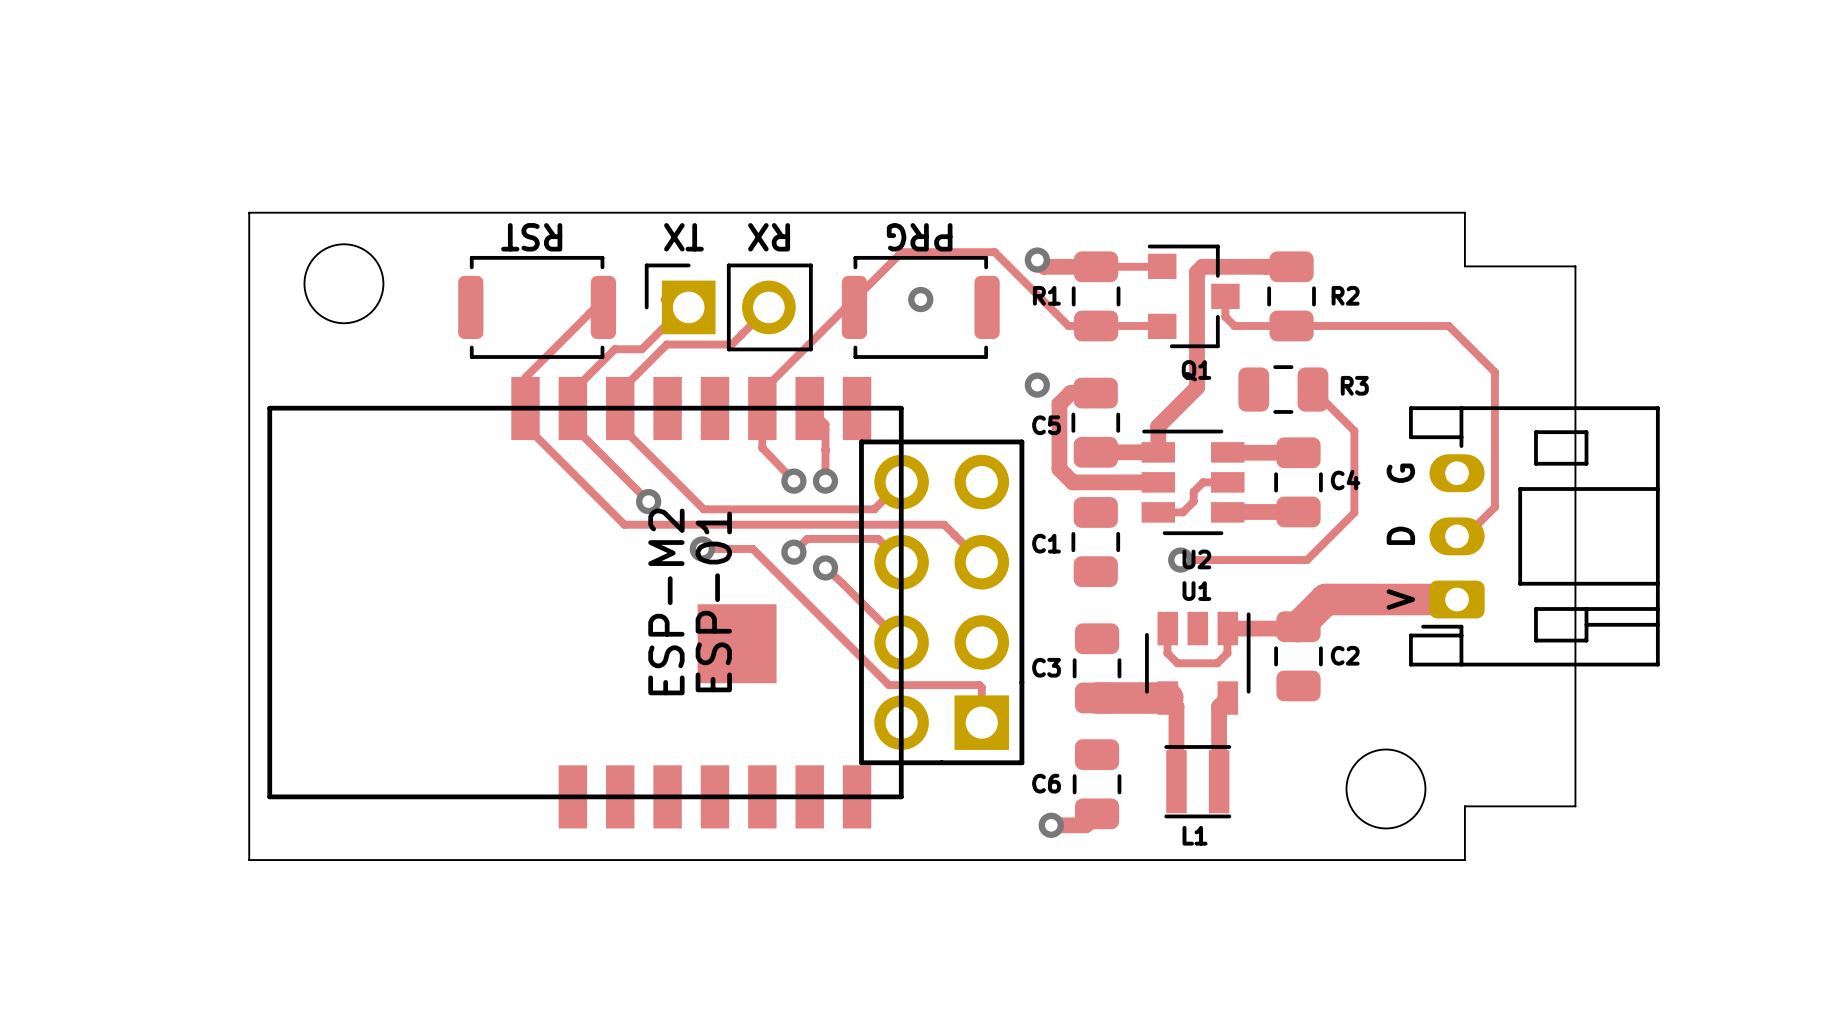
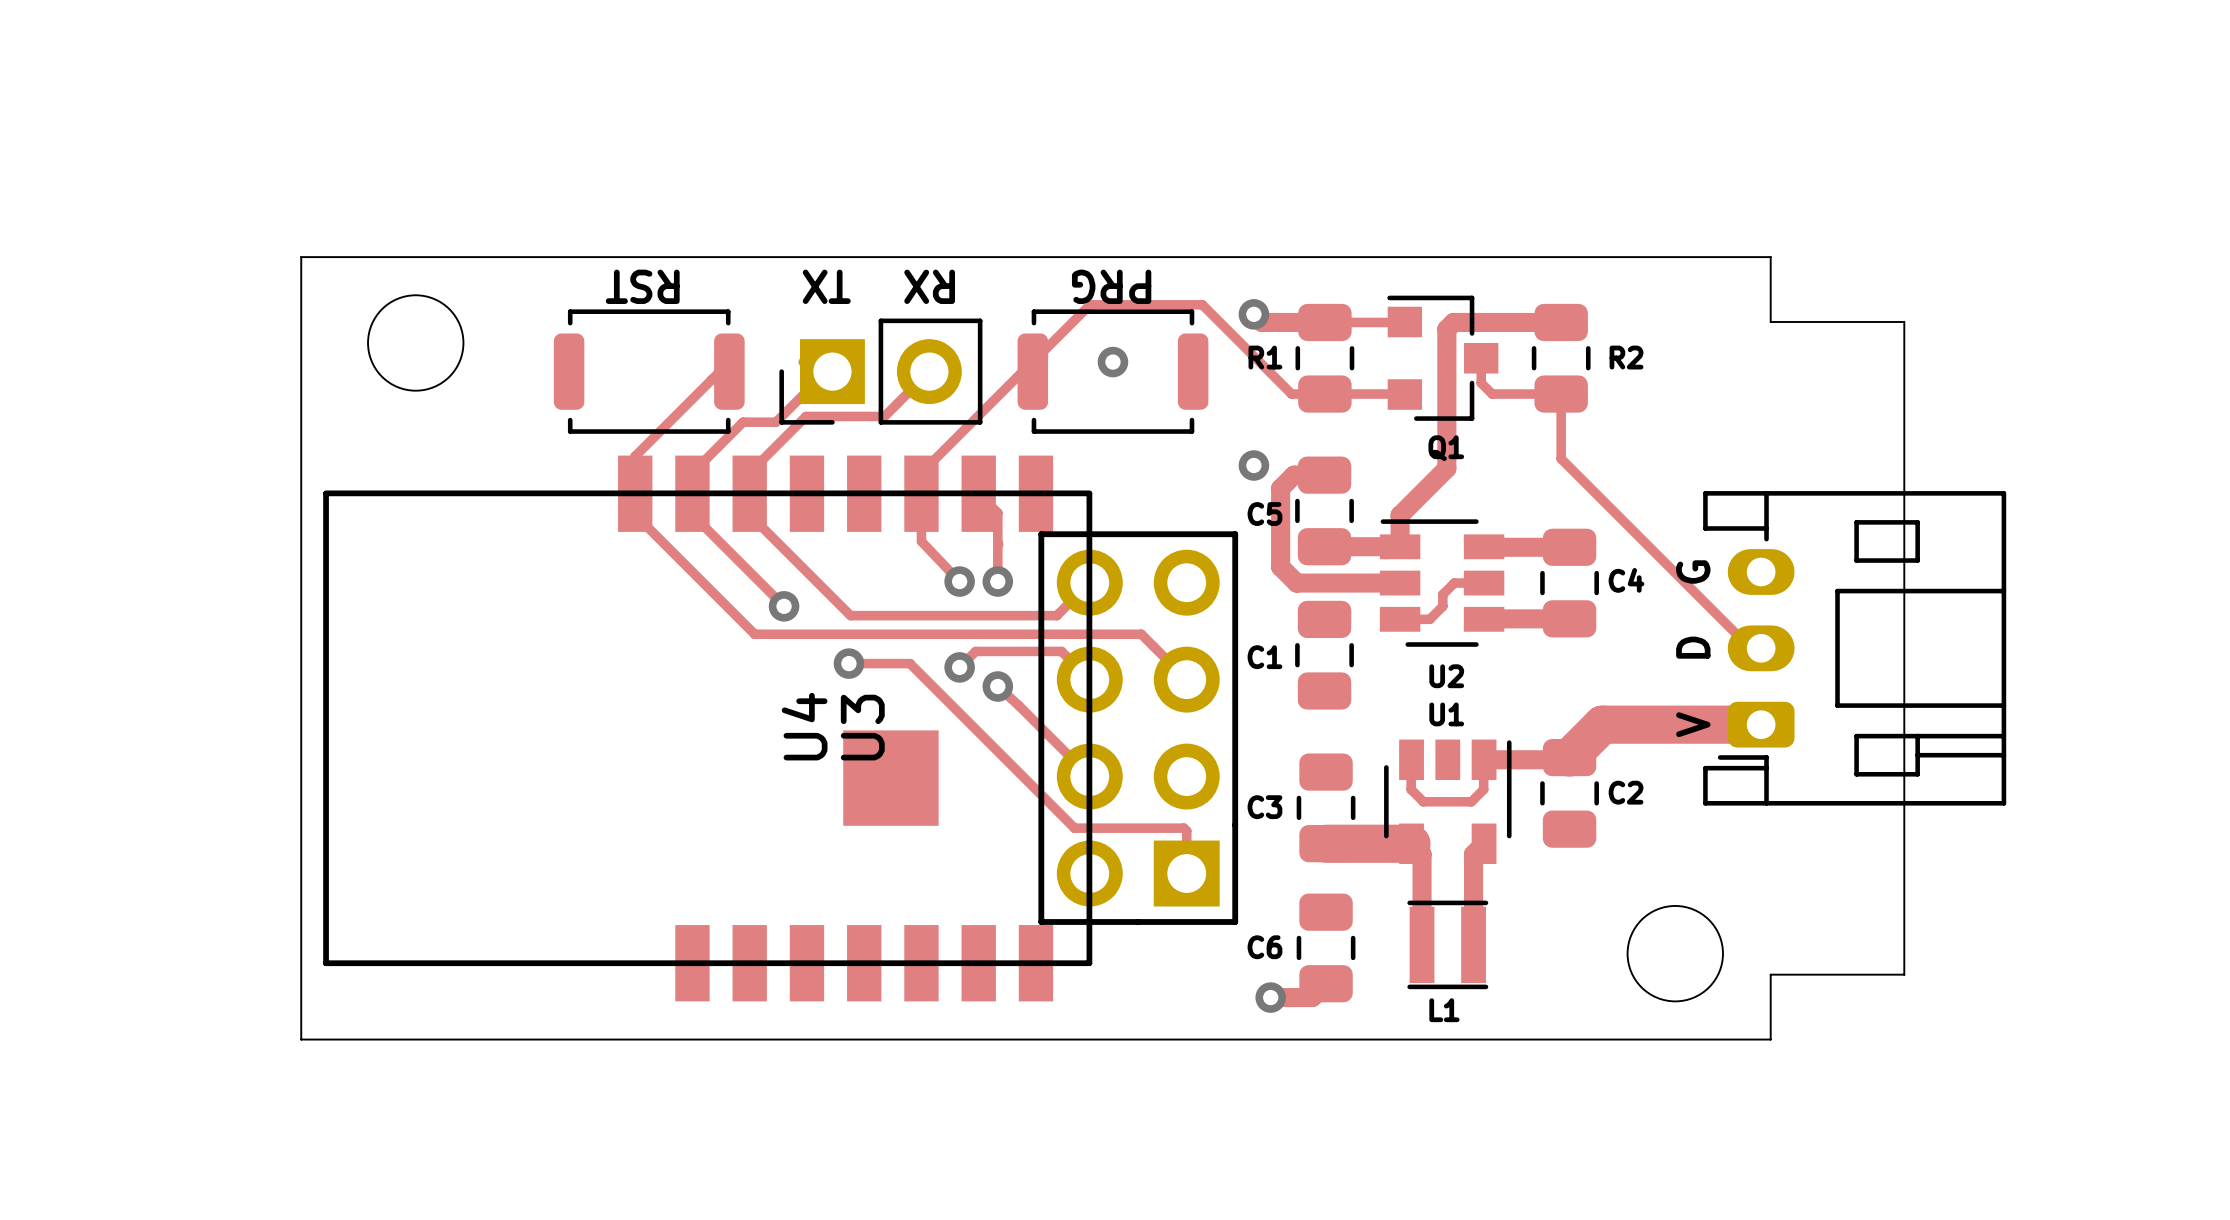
part footprint: [644, 263, 813, 352] -> [779, 318, 983, 425]
track: (1291, 325) (1448, 325) (1494, 372) (1494, 507) (1465, 536) (1457, 536) -> (1561, 394) (1561, 458) (1750, 648) (1761, 648)
R3: (1283, 389) -> none
track: (1312, 389) (1354, 430) (1354, 512) (1307, 560) (1180, 560) -> none
via: (1180, 560) -> none
ESP-M2 name: ESP-M2 (666, 601) -> U4 (804, 726)
ESP-01 name: ESP-01 (713, 601) -> U3 (862, 727)

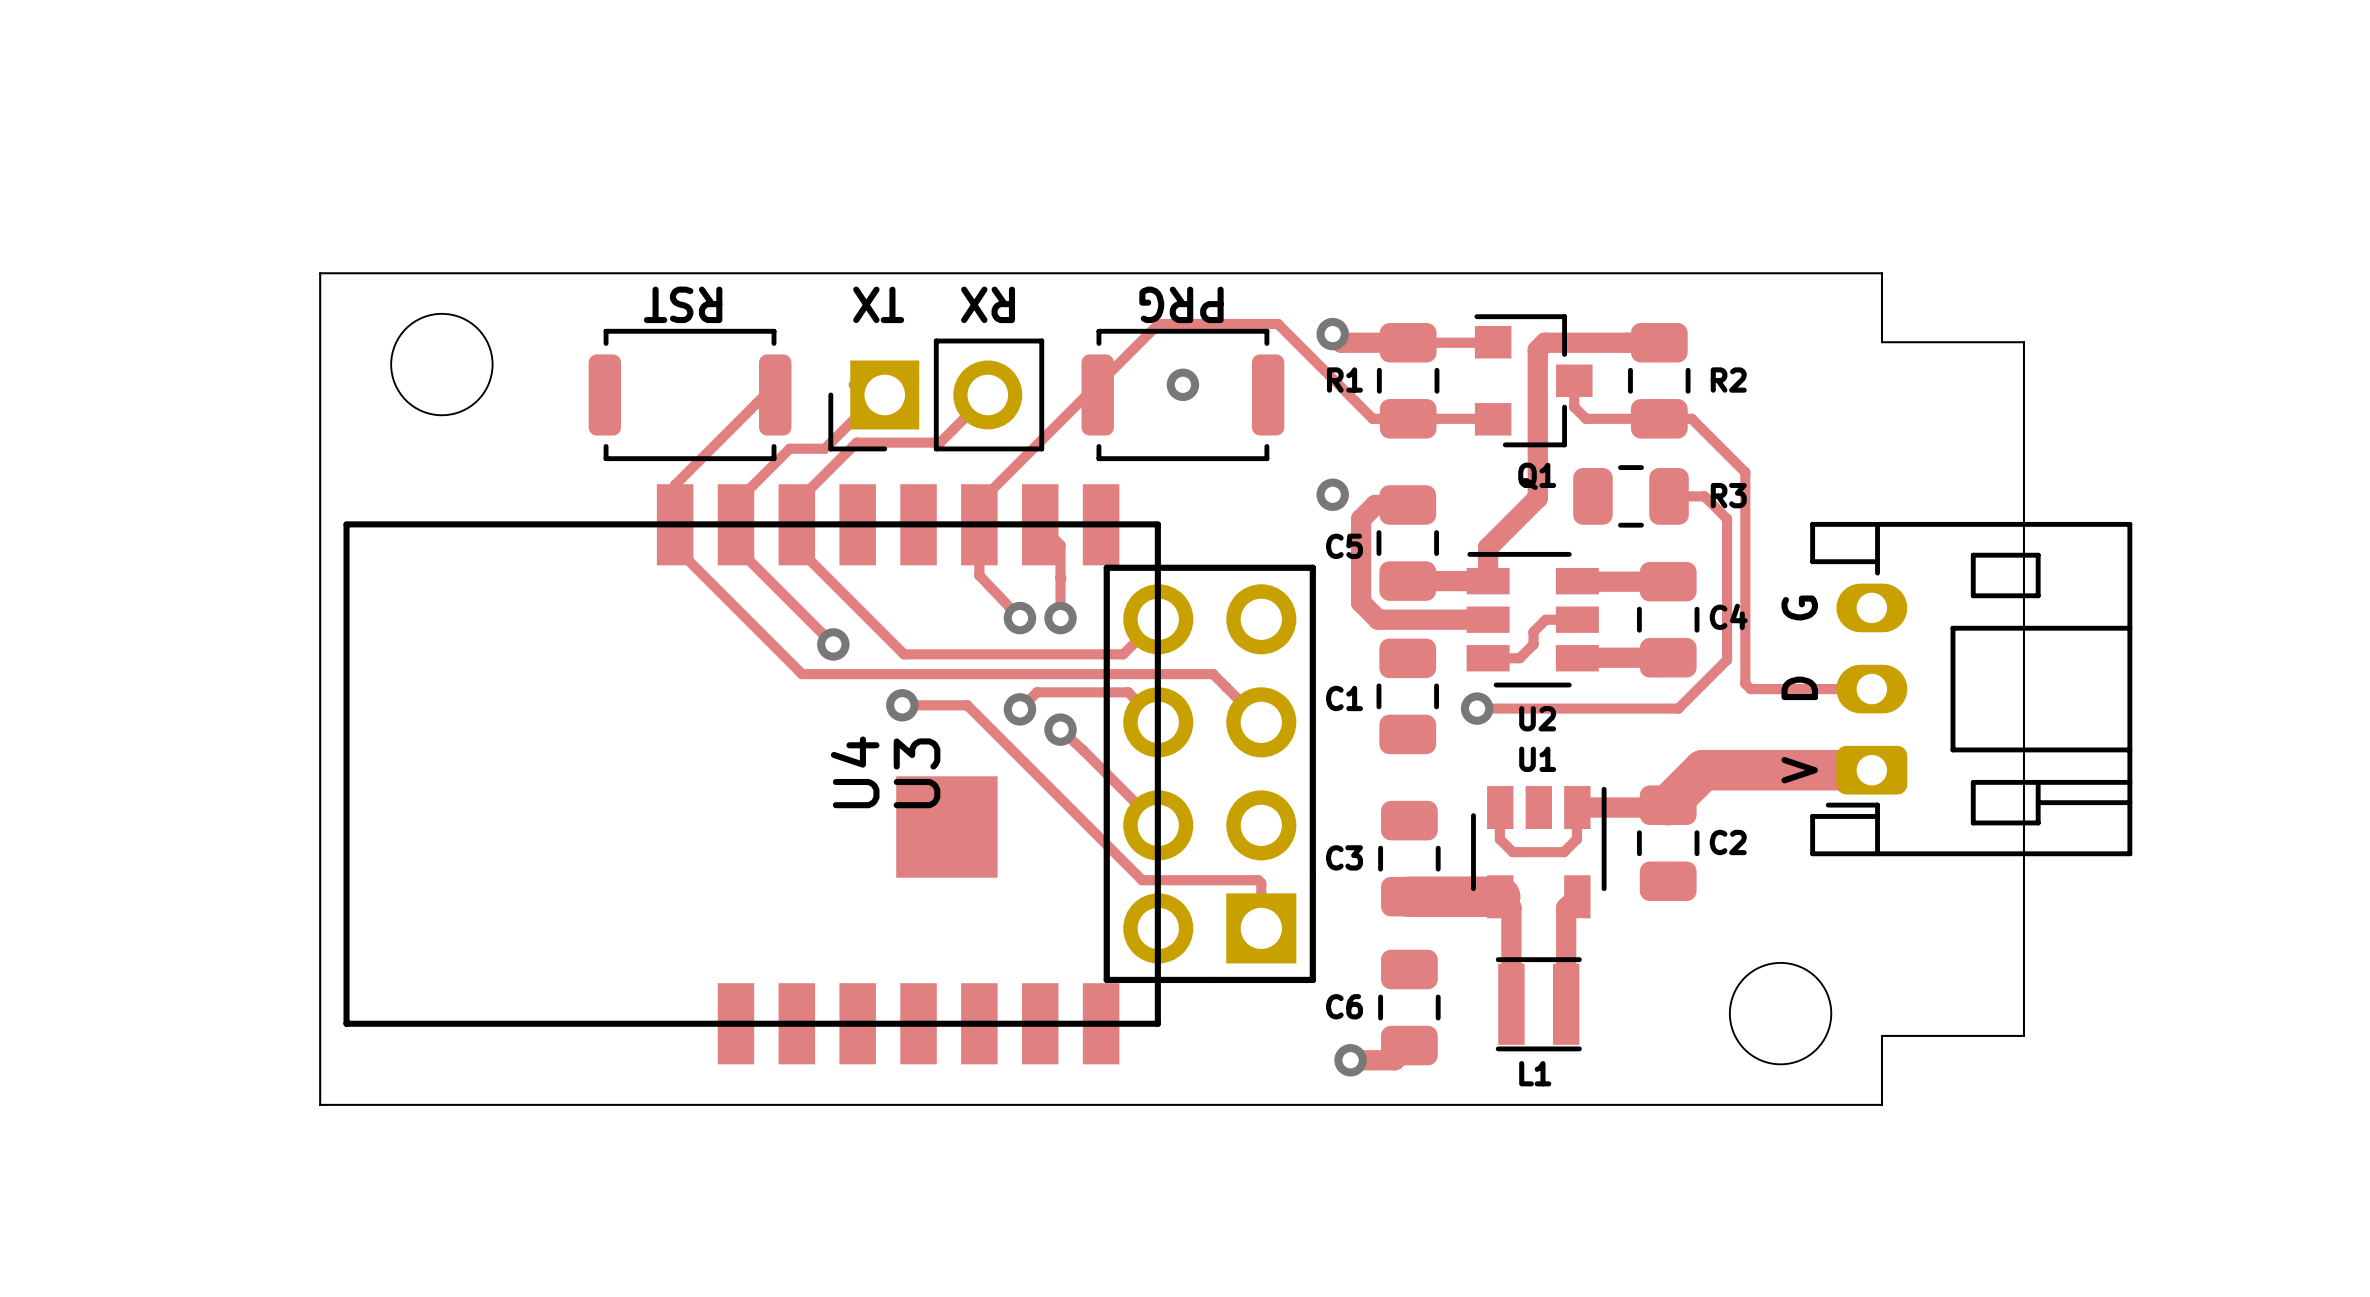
track: (1561, 394) (1561, 458) (1750, 648) -> (1659, 418) (1691, 418) (1745, 472) (1745, 683) (1750, 689) (1860, 689)
R3: none -> (1630, 496)
track: none -> (1669, 496) (1704, 496) (1727, 518) (1727, 659) (1678, 708) (1477, 708)
via: none -> (1477, 708)

